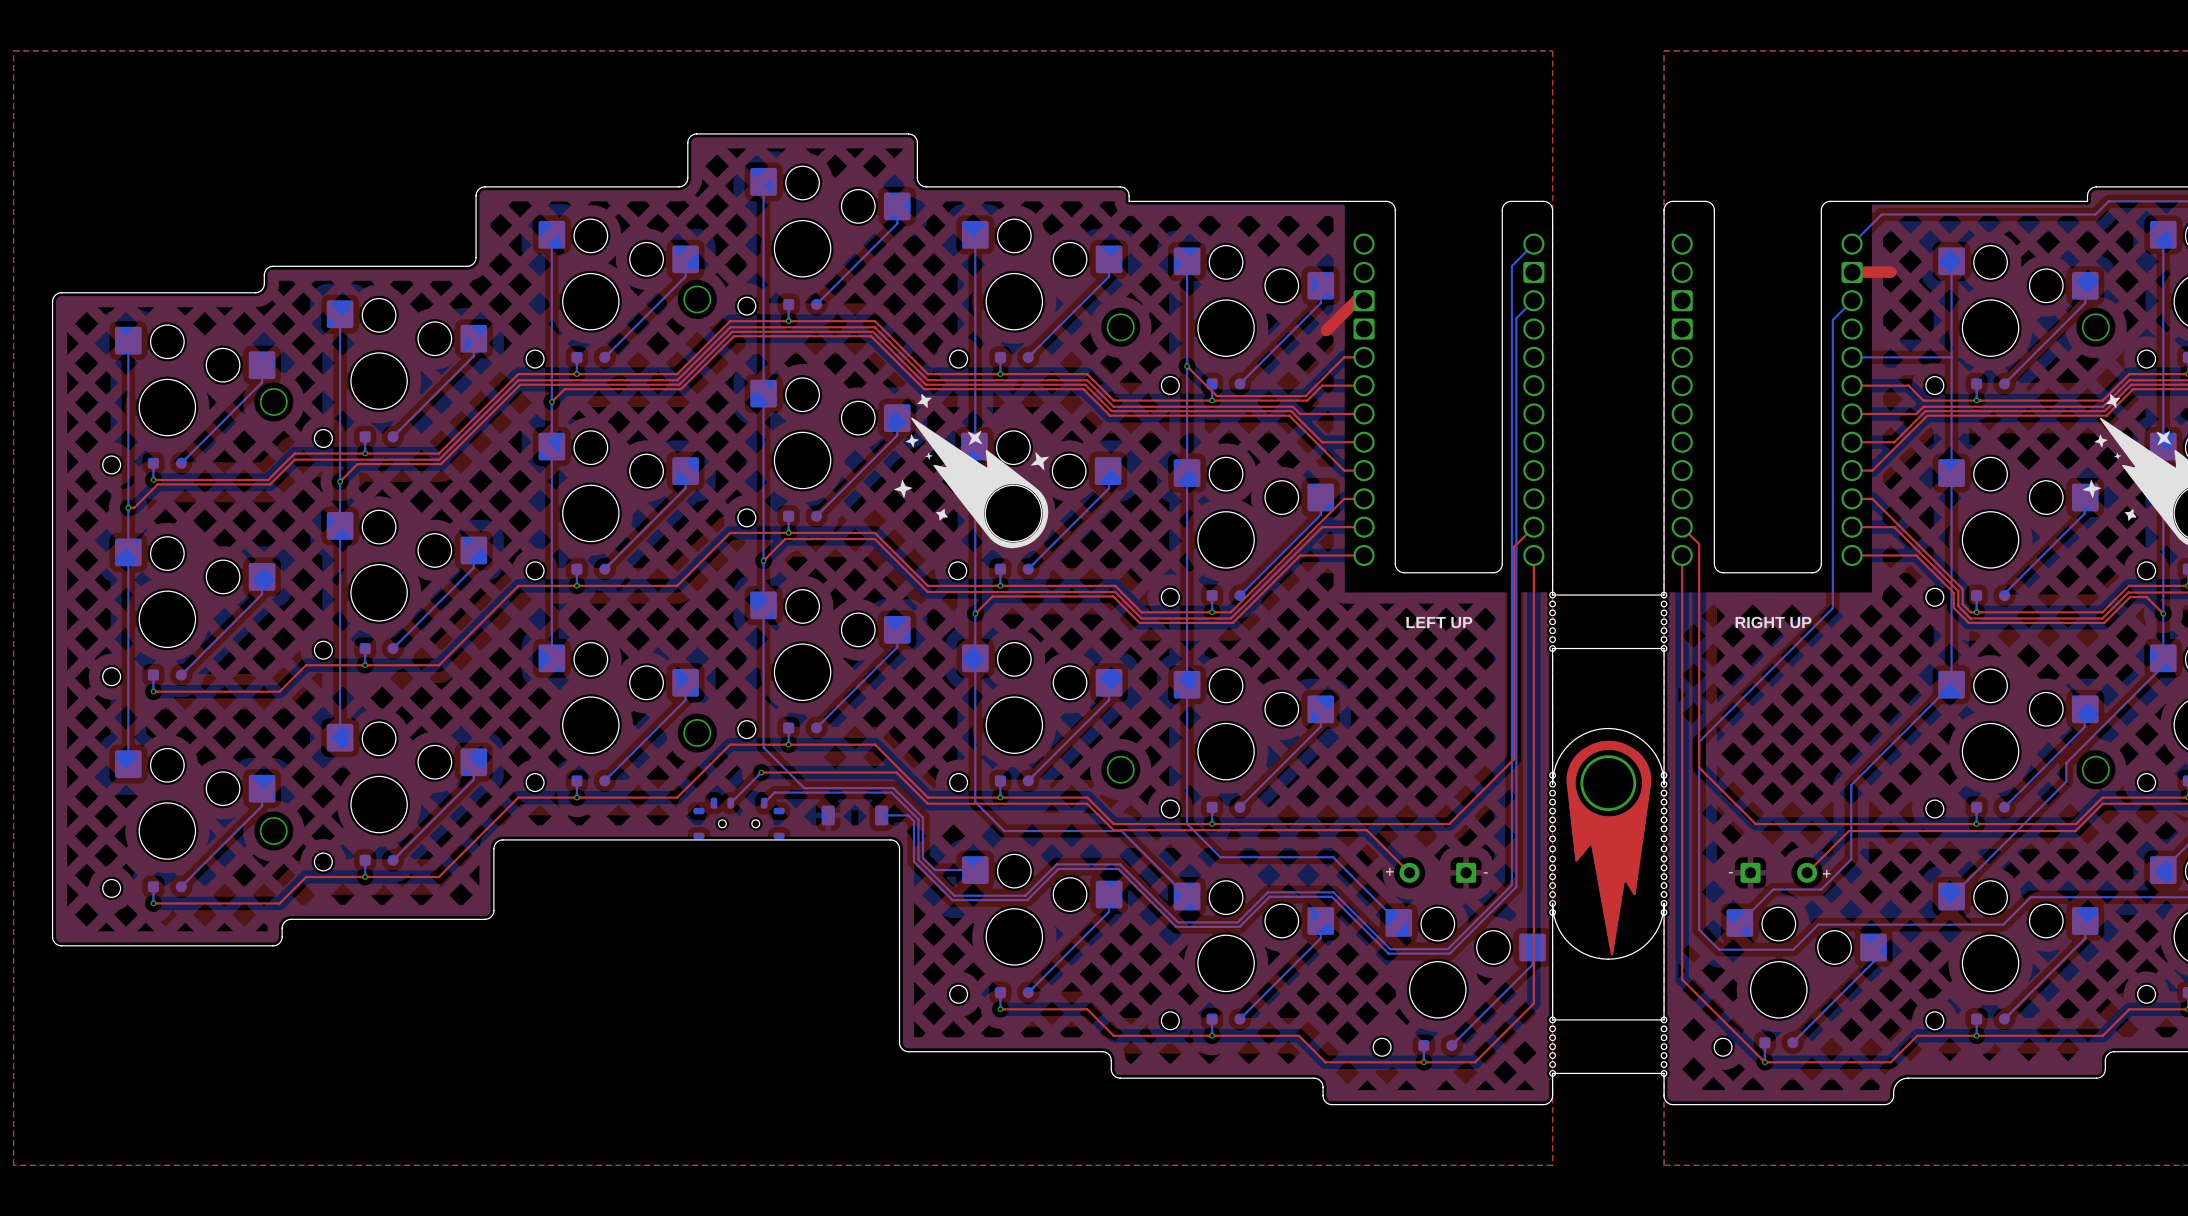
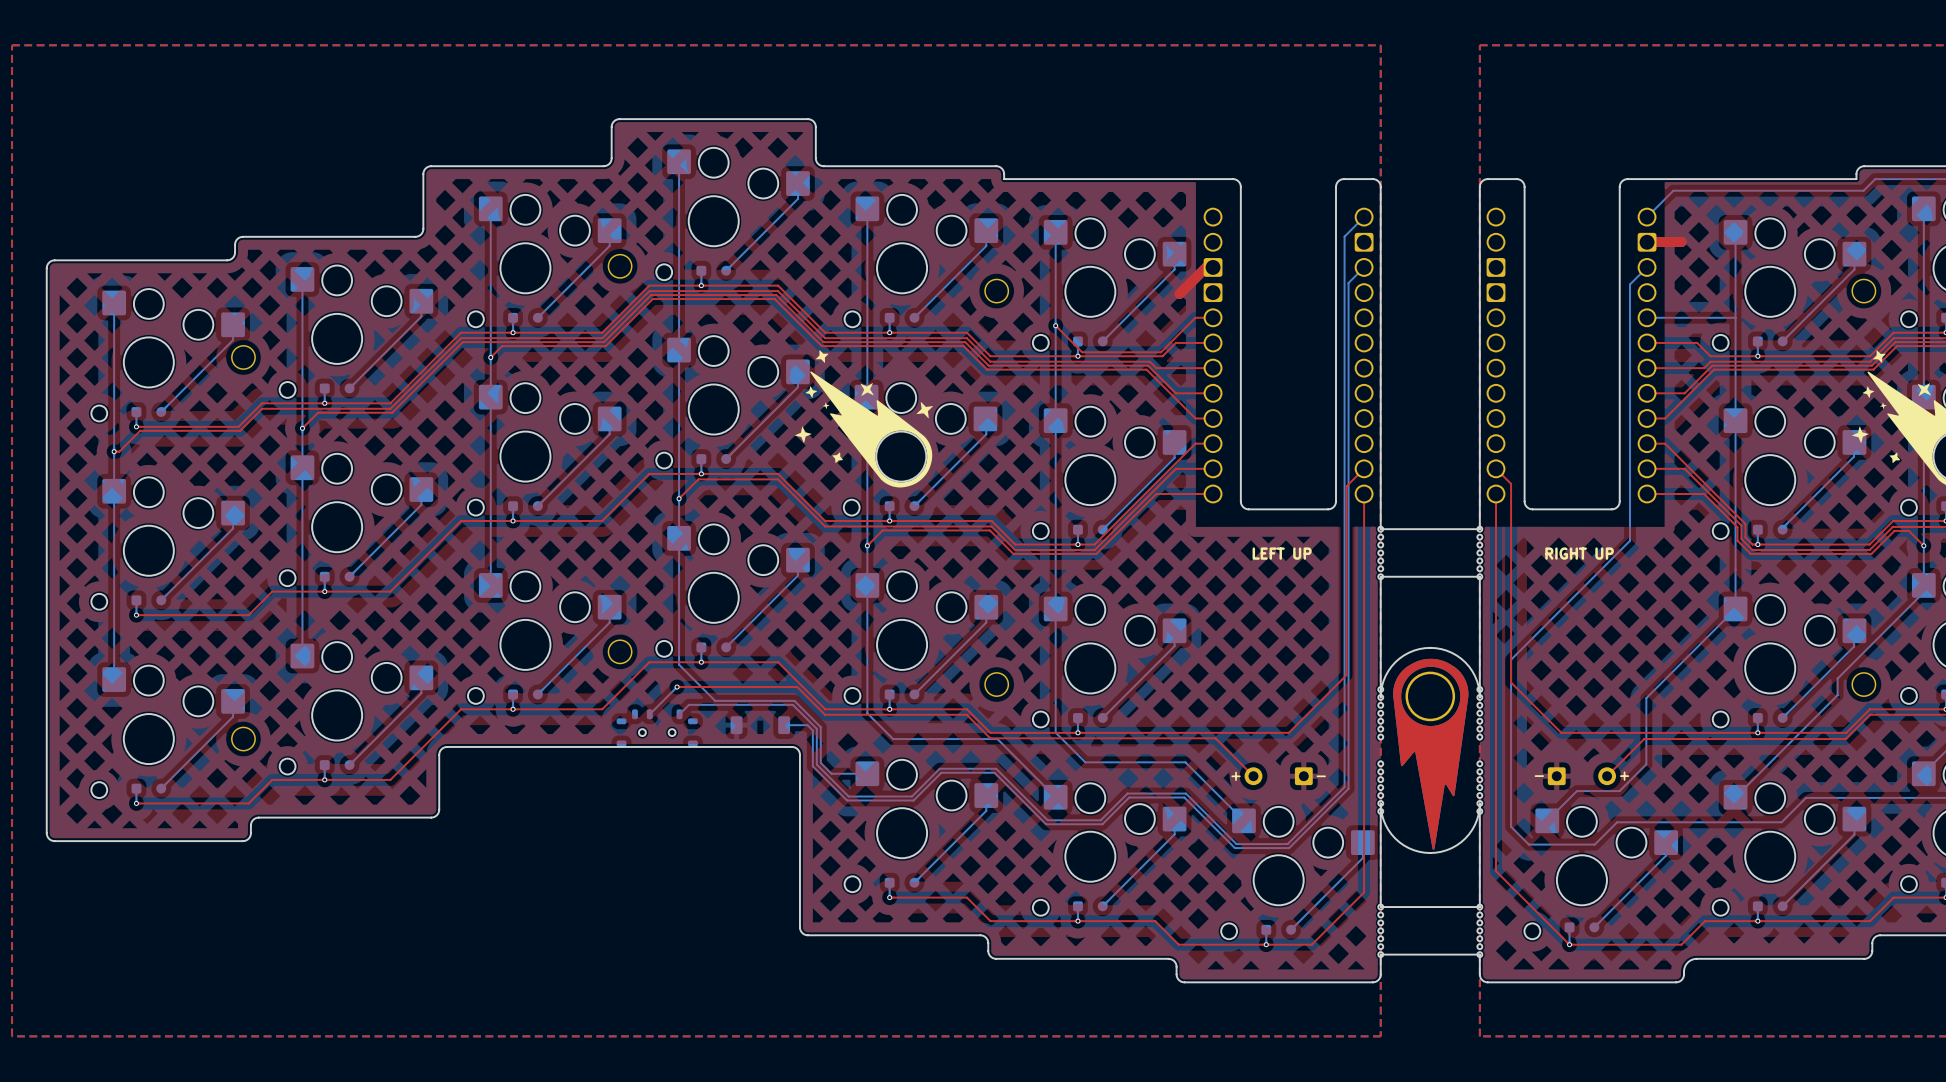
part: (1552, 838) -> none
part: (1664, 838) -> none
part: (1552, 848) -> none
part: (1664, 848) -> none

